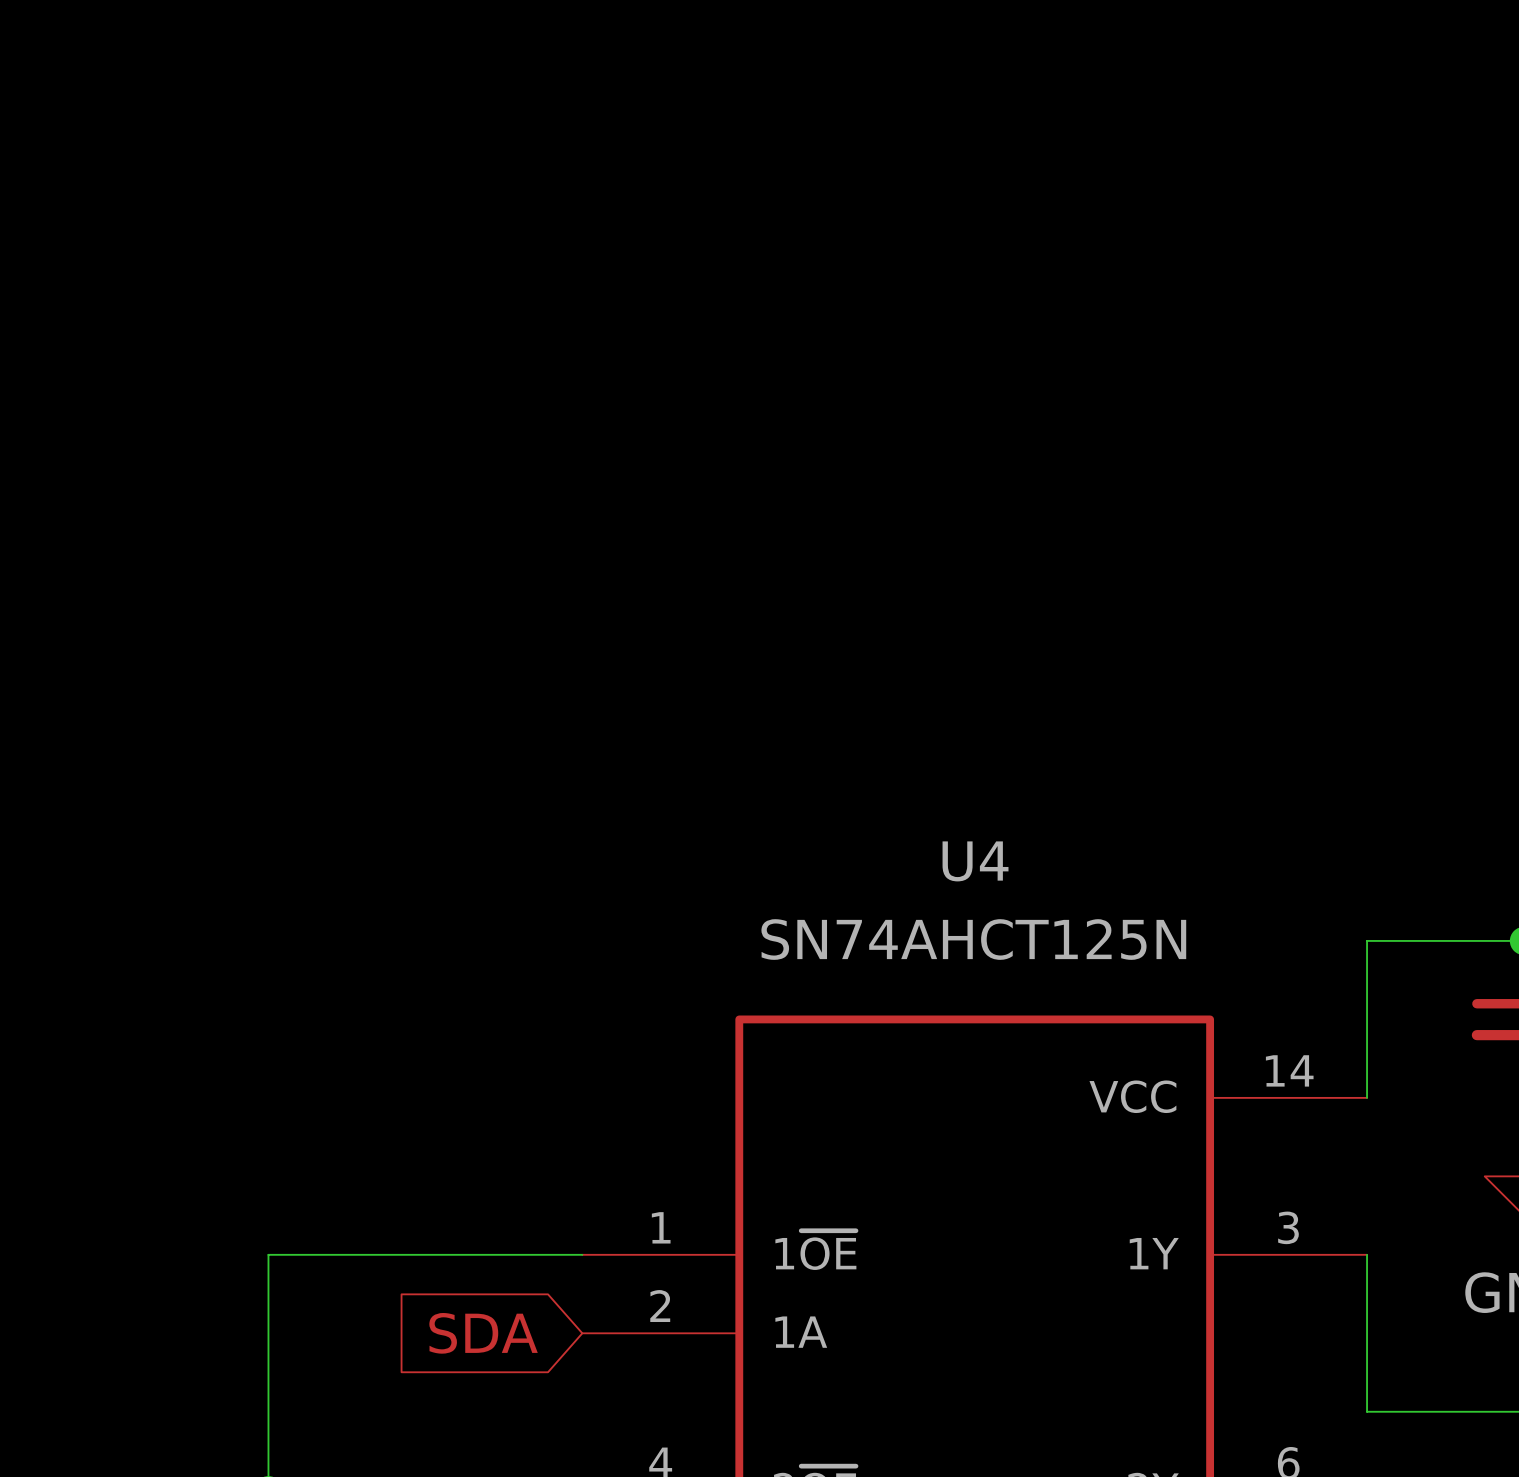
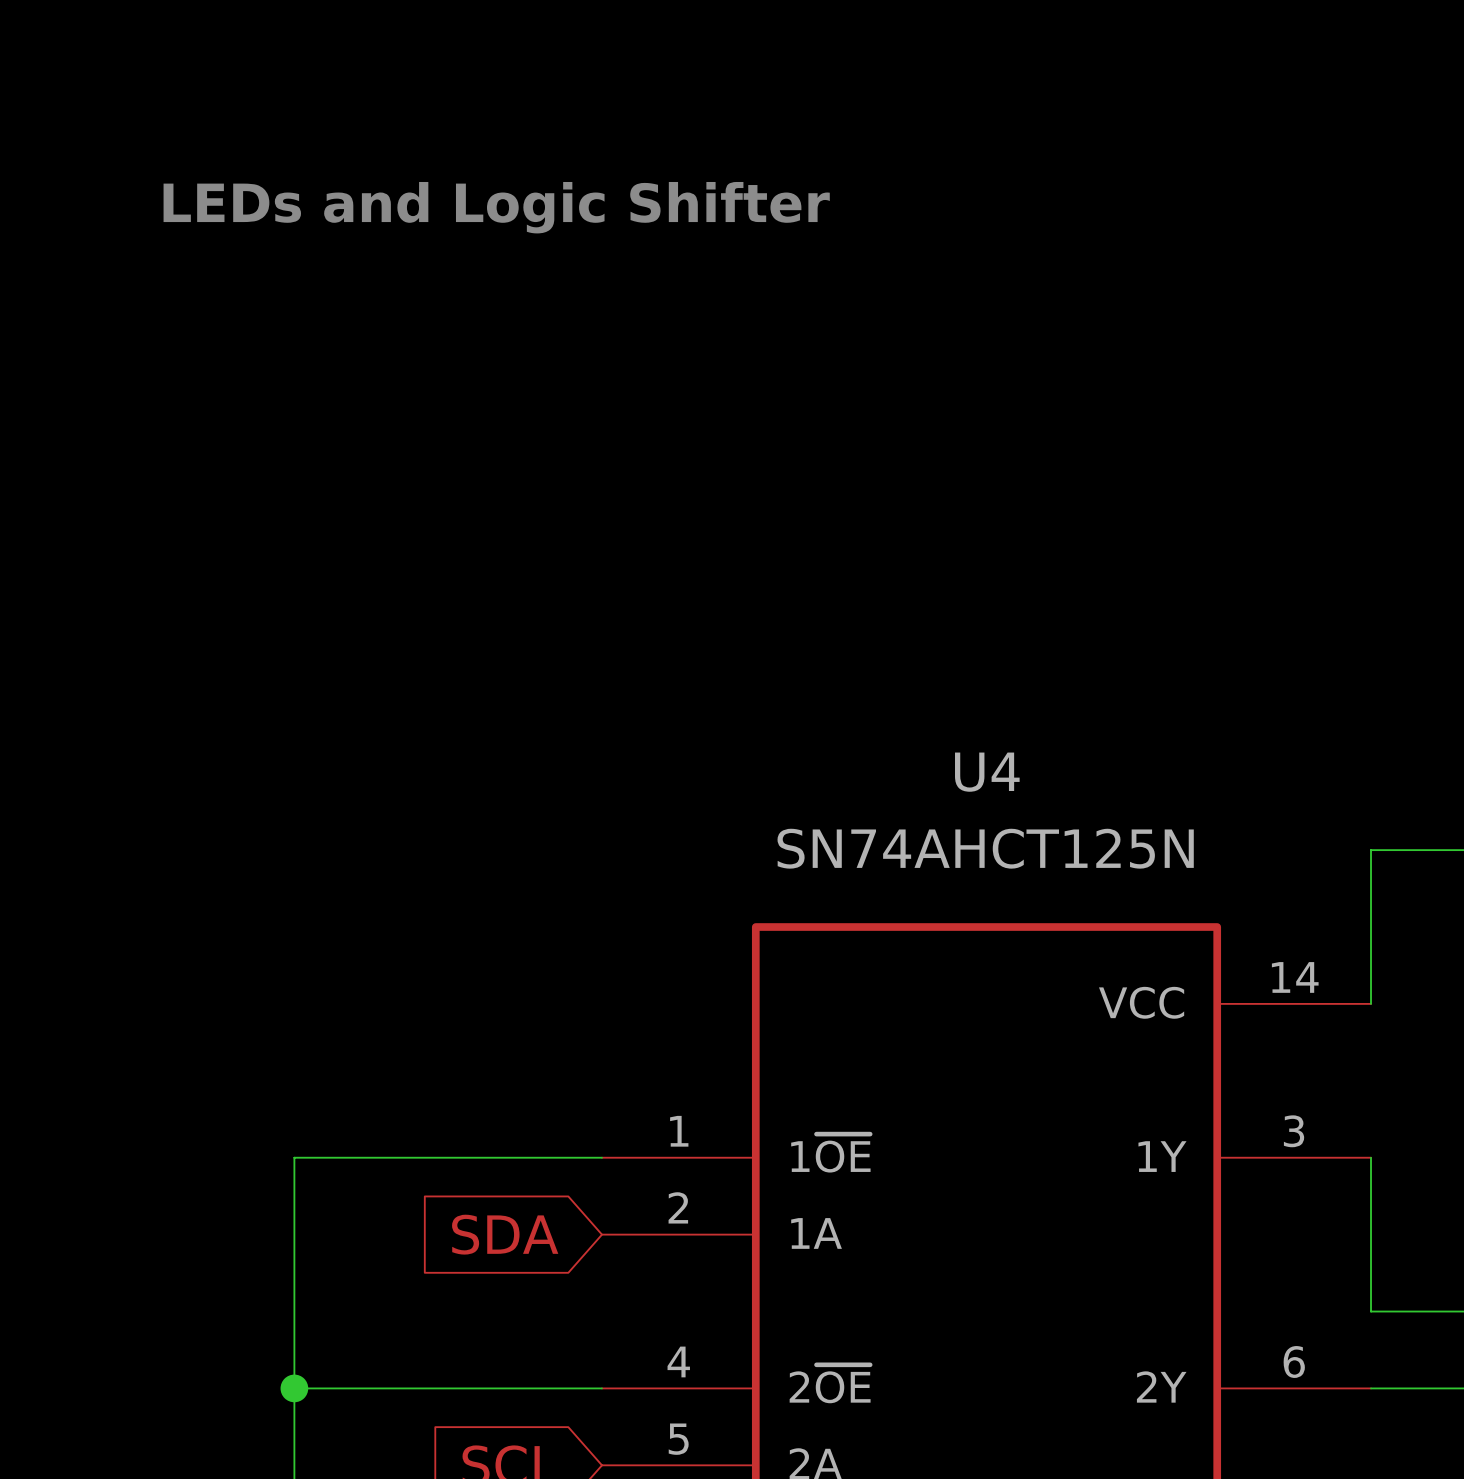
text: none -> LEDs and Logic Shifter (496, 207)

